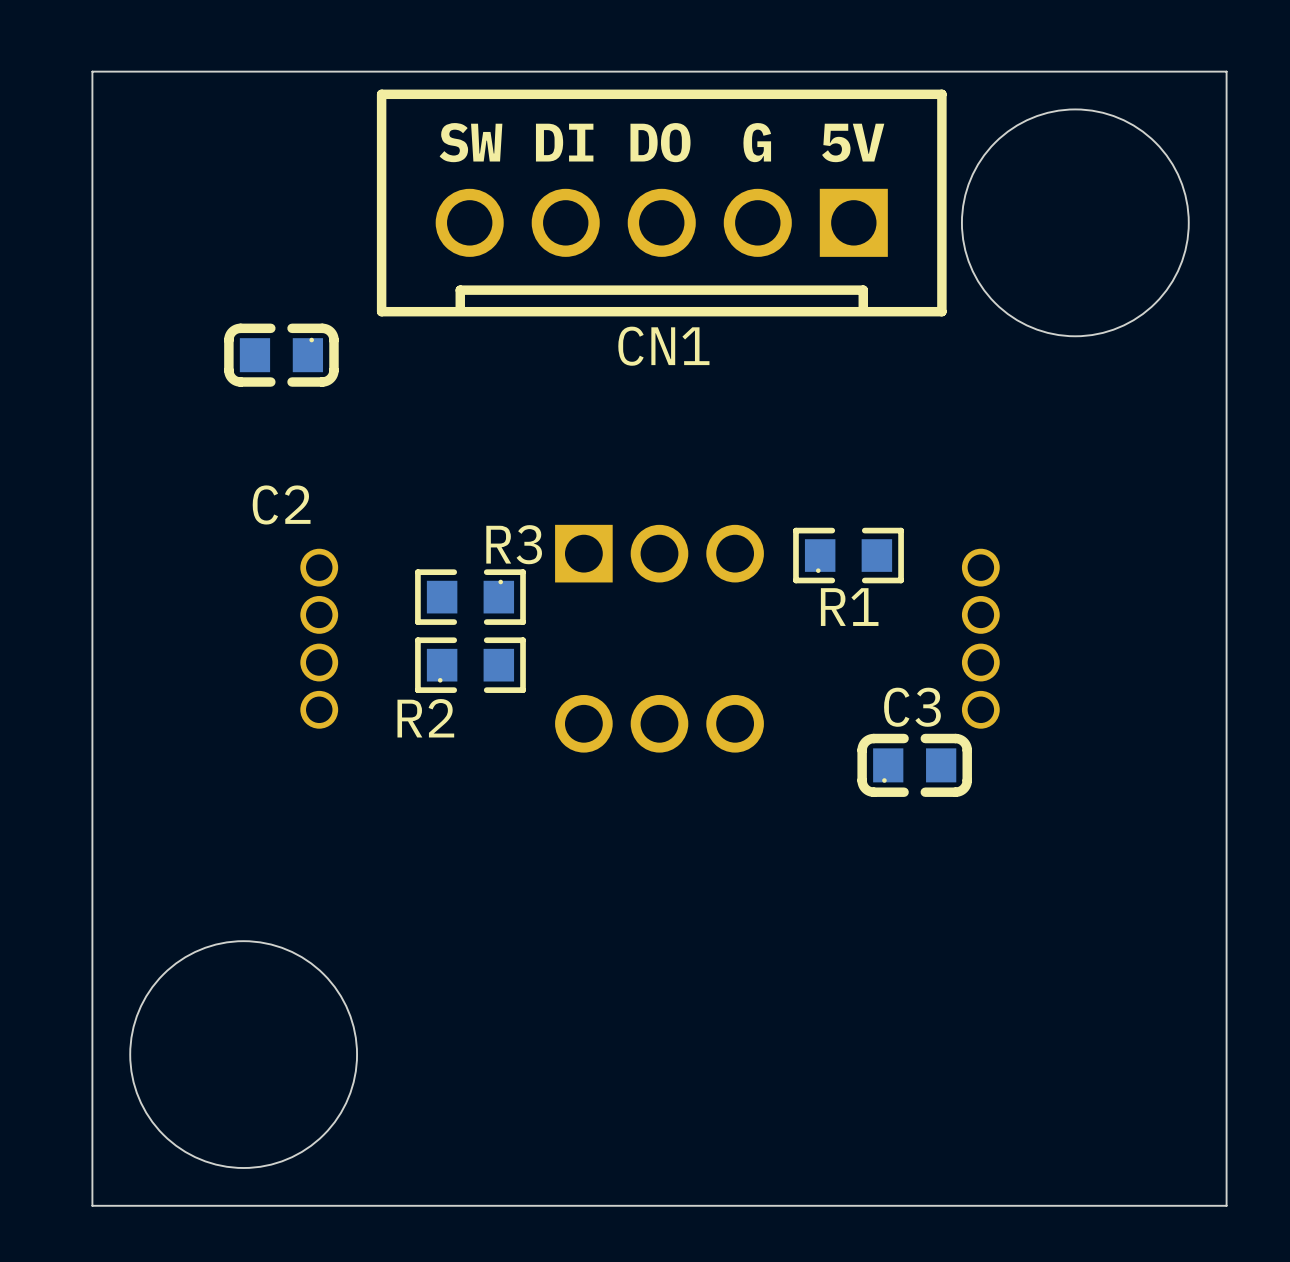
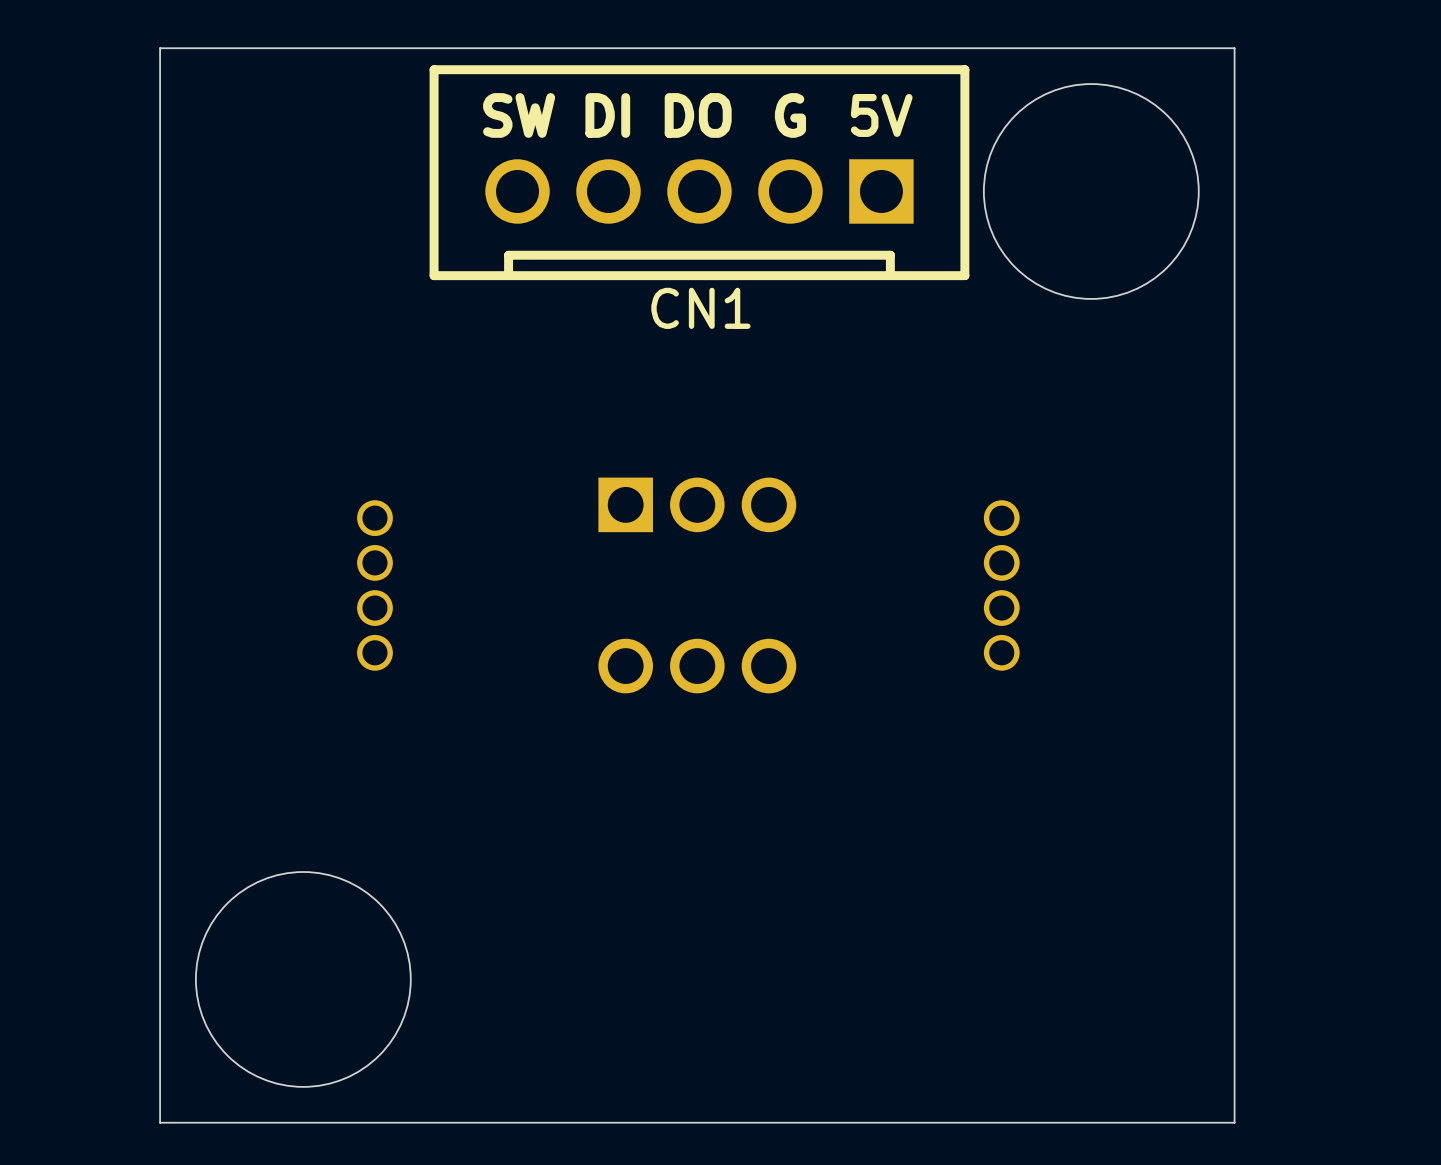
C2: (281, 355) -> none
R1: (848, 555) -> none
R3: (470, 597) -> none
R2: (470, 665) -> none
C3: (914, 765) -> none

